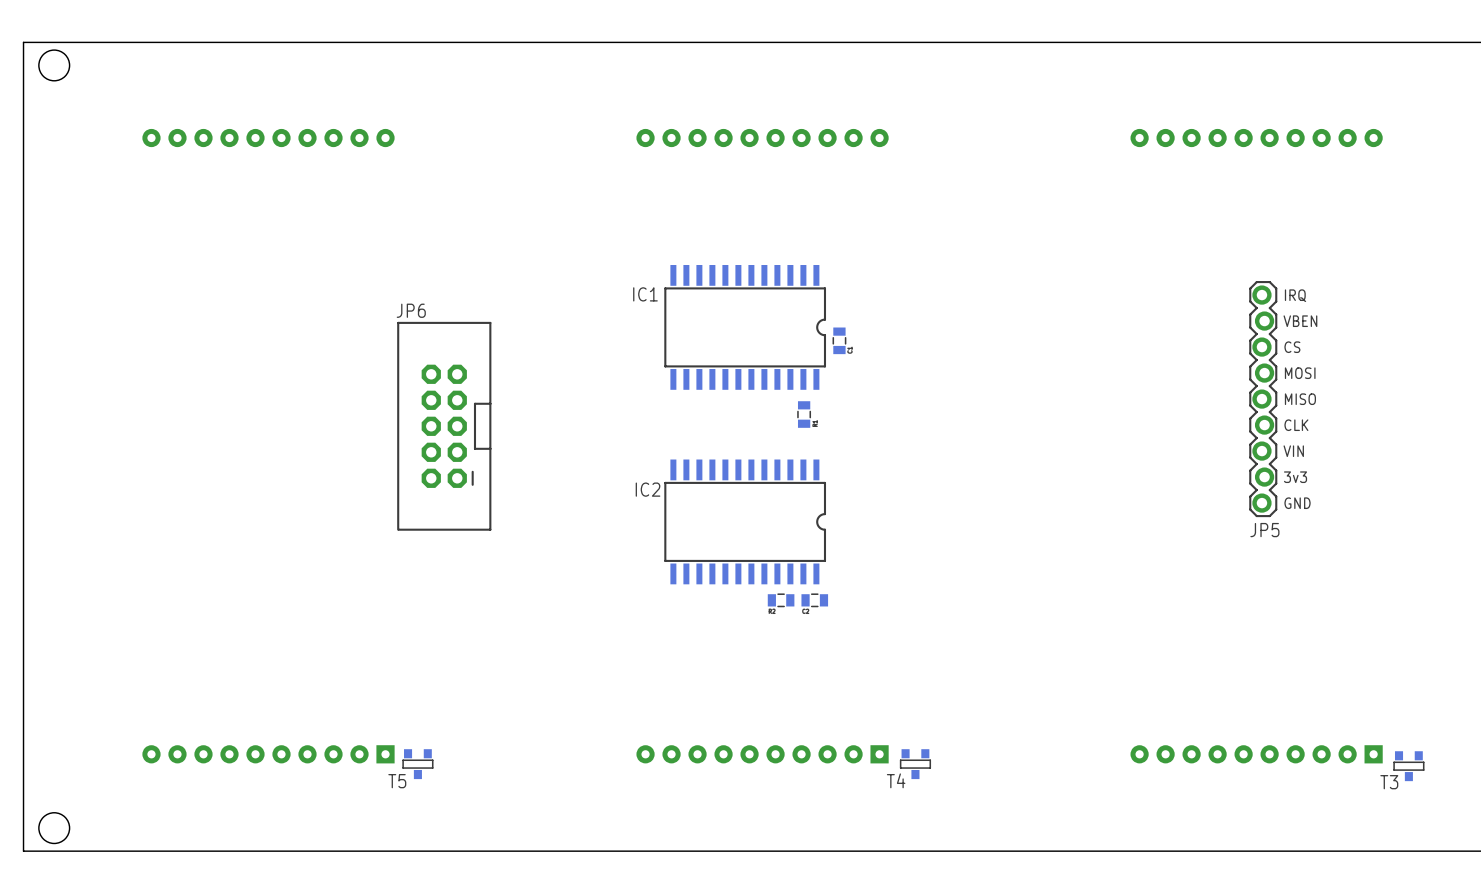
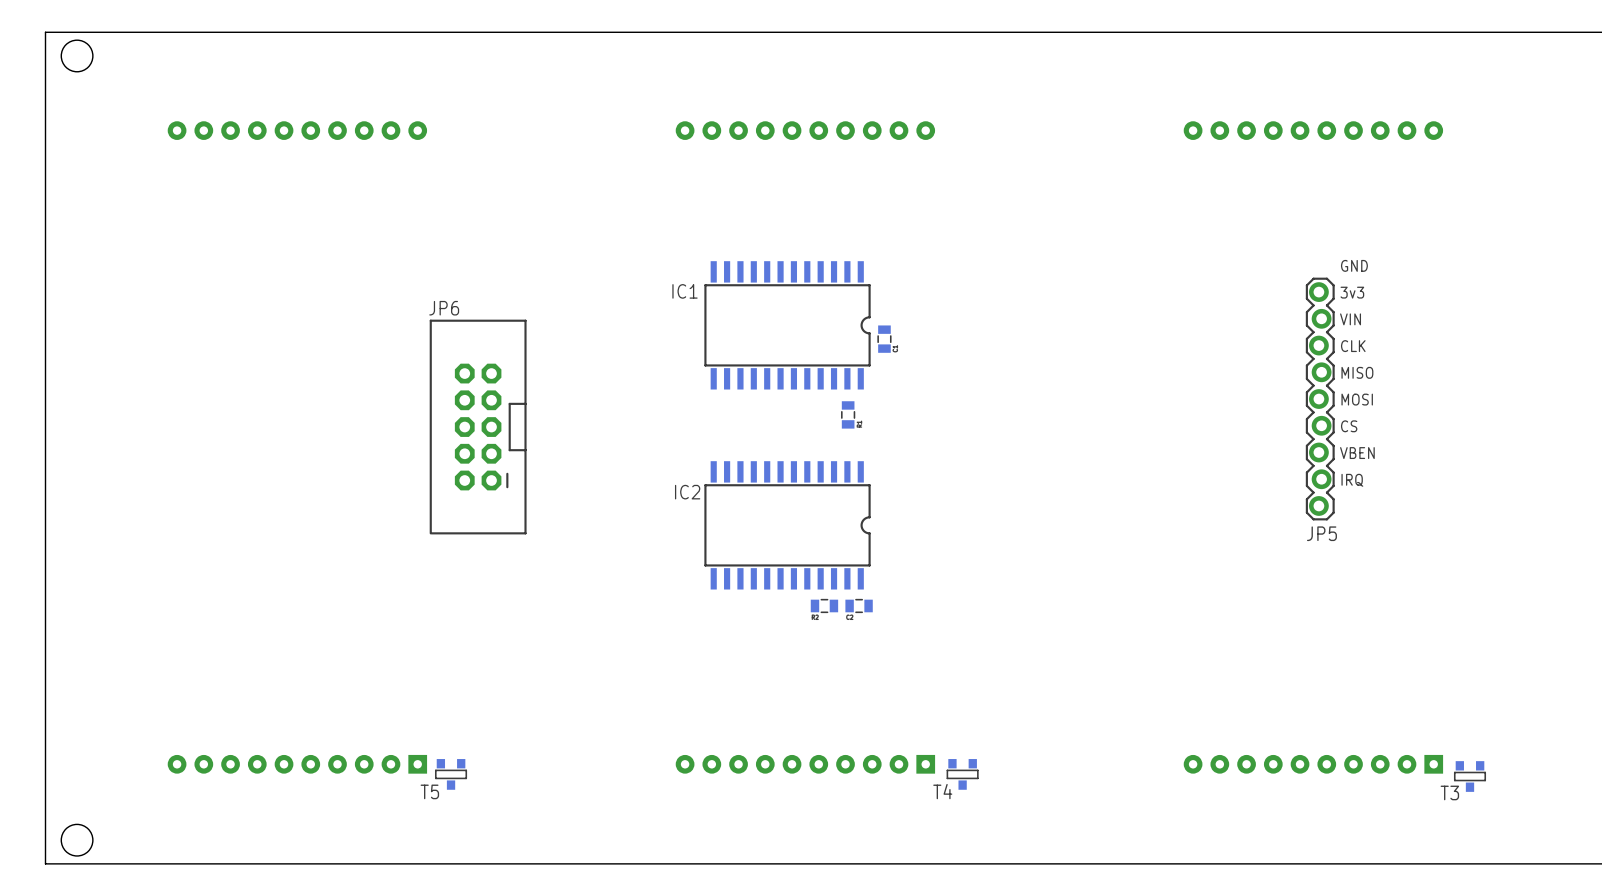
text: IRQ (1295, 295) -> 3v3 (1352, 292)
text: VBEN (1300, 321) -> VIN (1350, 319)
text: CS (1292, 347) -> CLK (1353, 346)
text: MOSI (1300, 373) -> MISO (1357, 372)
text: MISO (1300, 399) -> MOSI (1357, 399)
text: CLK (1296, 425) -> CS (1349, 426)
text: VIN (1293, 451) -> VBEN (1357, 453)
text: 3v3 (1295, 477) -> IRQ (1352, 480)
text position: GND (1297, 503) -> GND (1354, 265)

